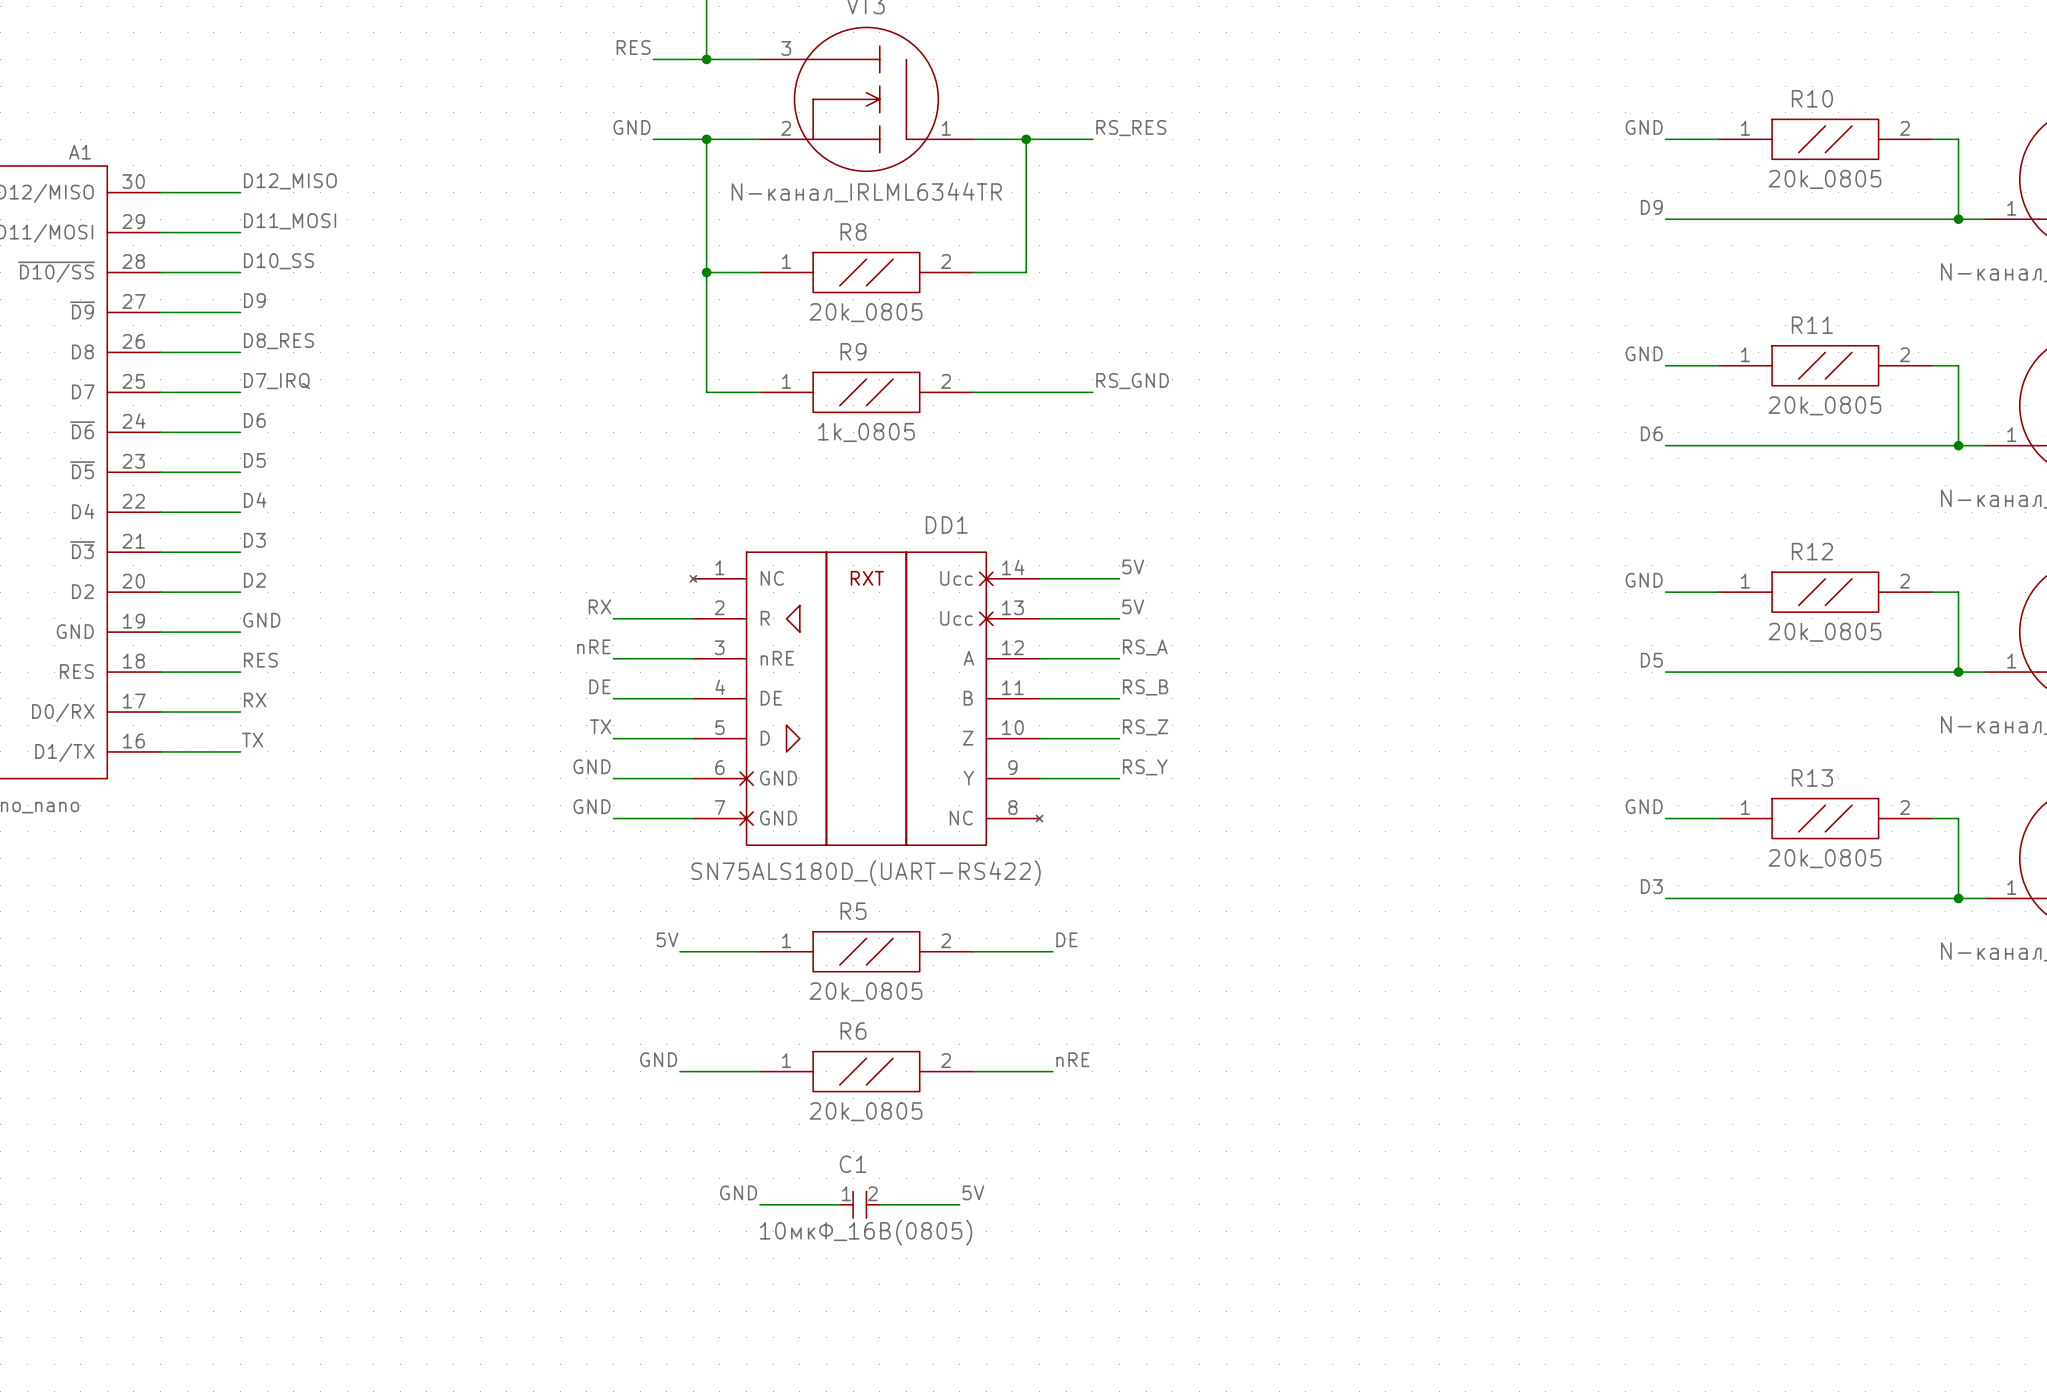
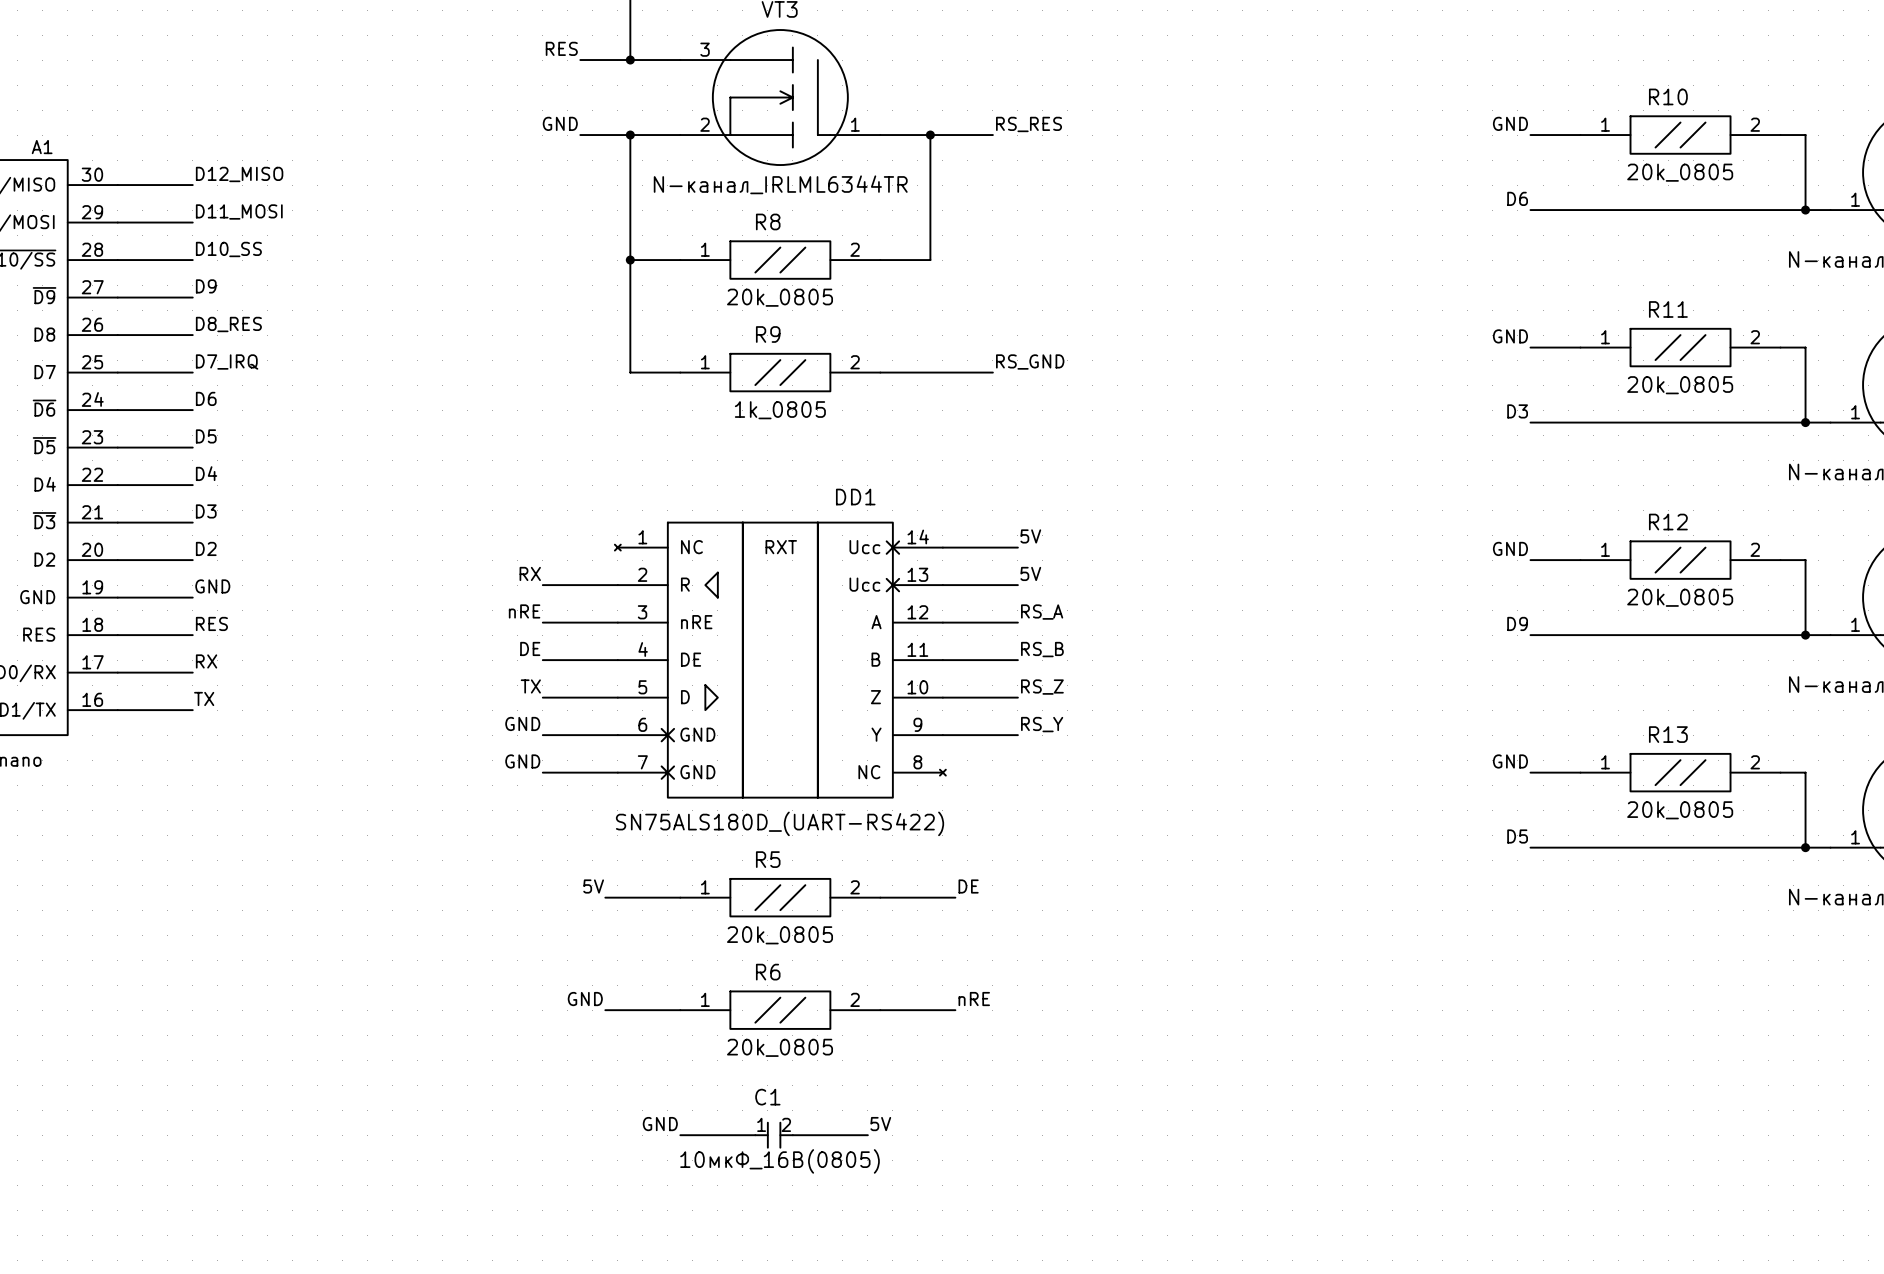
label: D9 (1651, 207) -> D6 (1517, 198)
label: D6 (1651, 433) -> D3 (1517, 411)
label: D5 (1651, 660) -> D9 (1517, 623)
label: D3 (1651, 886) -> D5 (1517, 836)

